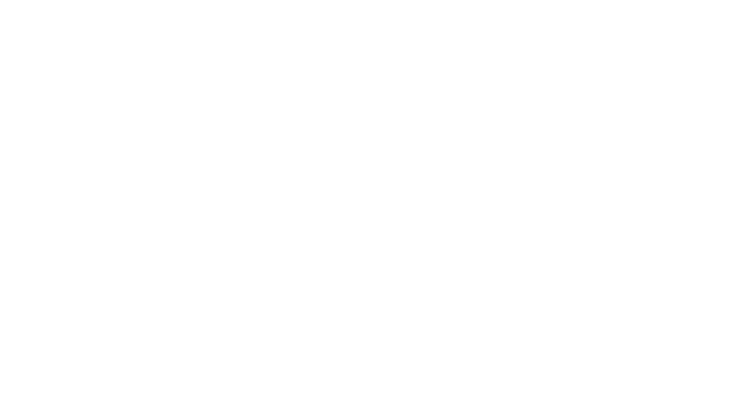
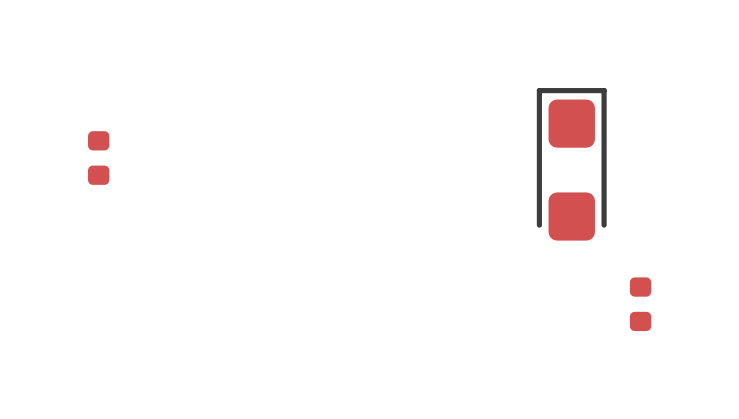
part: none -> (98, 158)
part: none -> (571, 164)
part: none -> (640, 304)

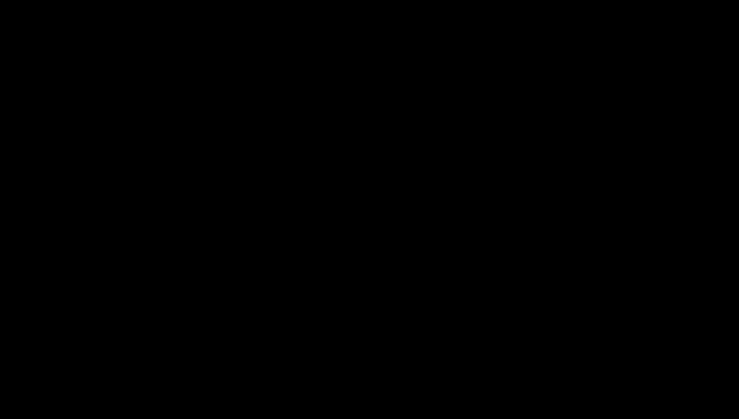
part: (98, 158) -> none
part: (571, 164) -> none
part: (640, 304) -> none

